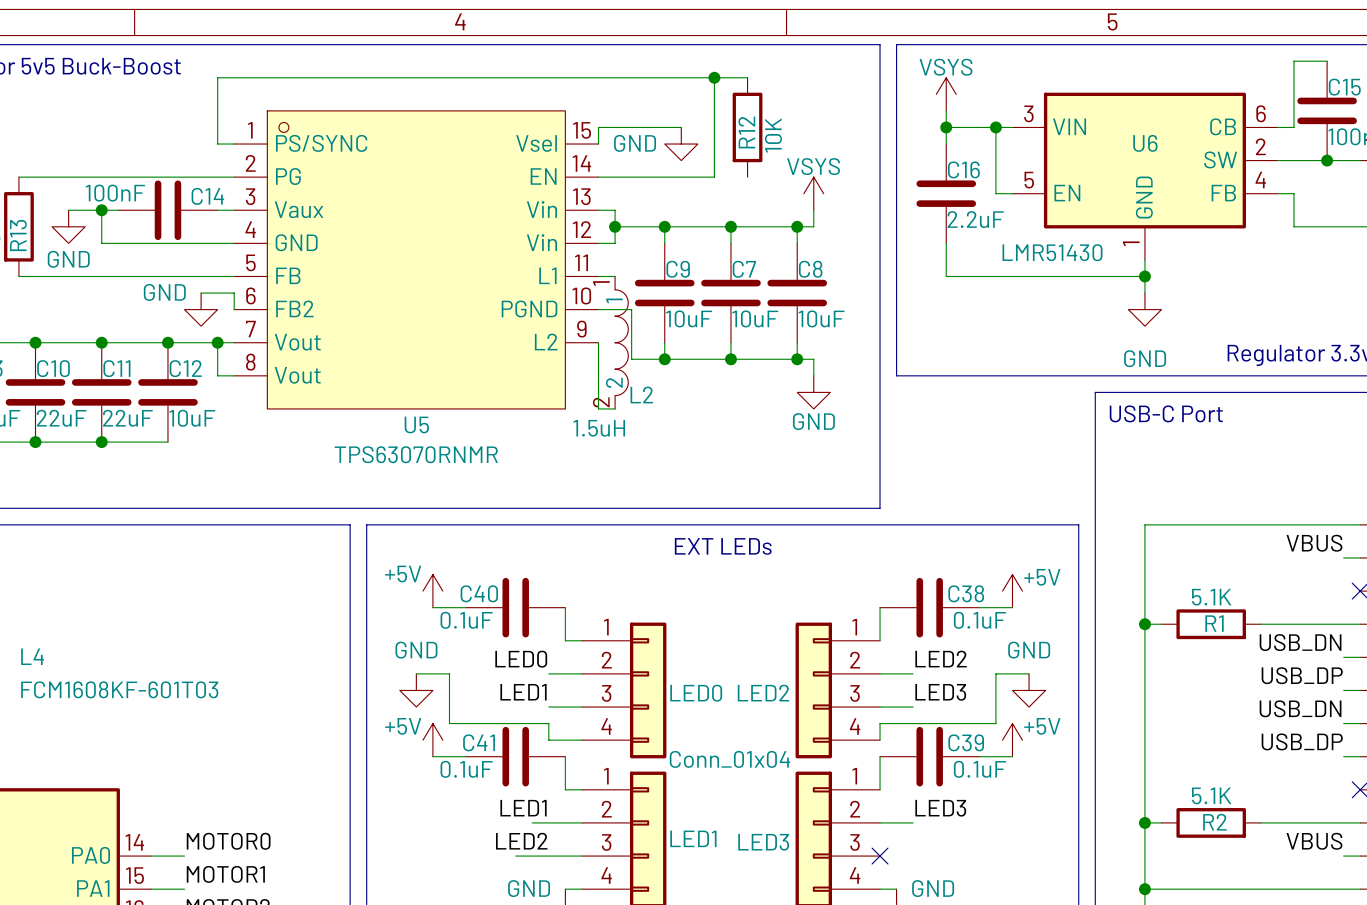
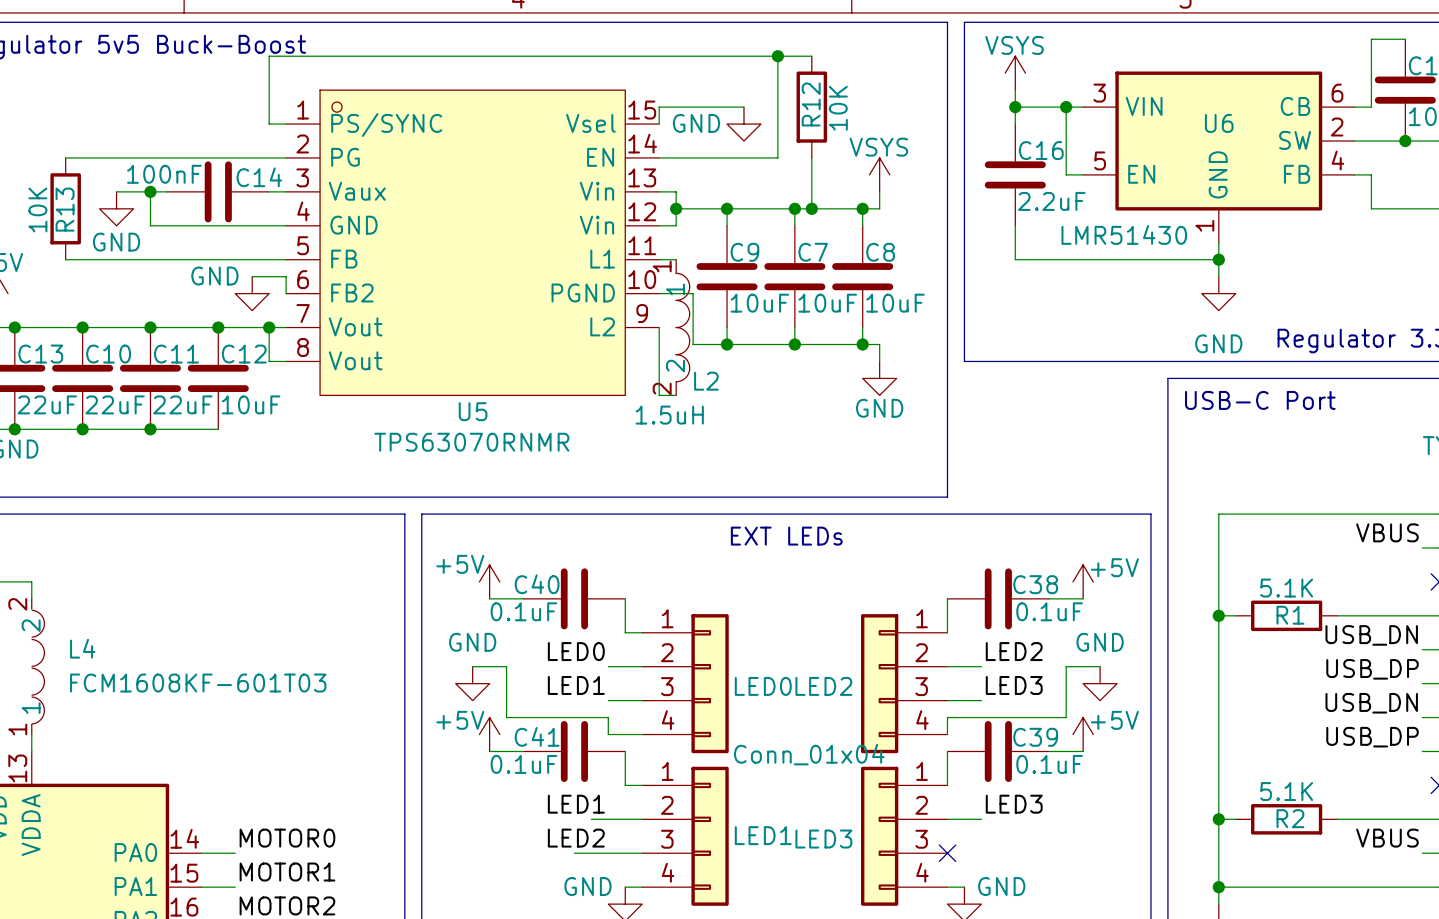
wire: none -> (811, 157) (811, 208)
junction: none -> (811, 208)

